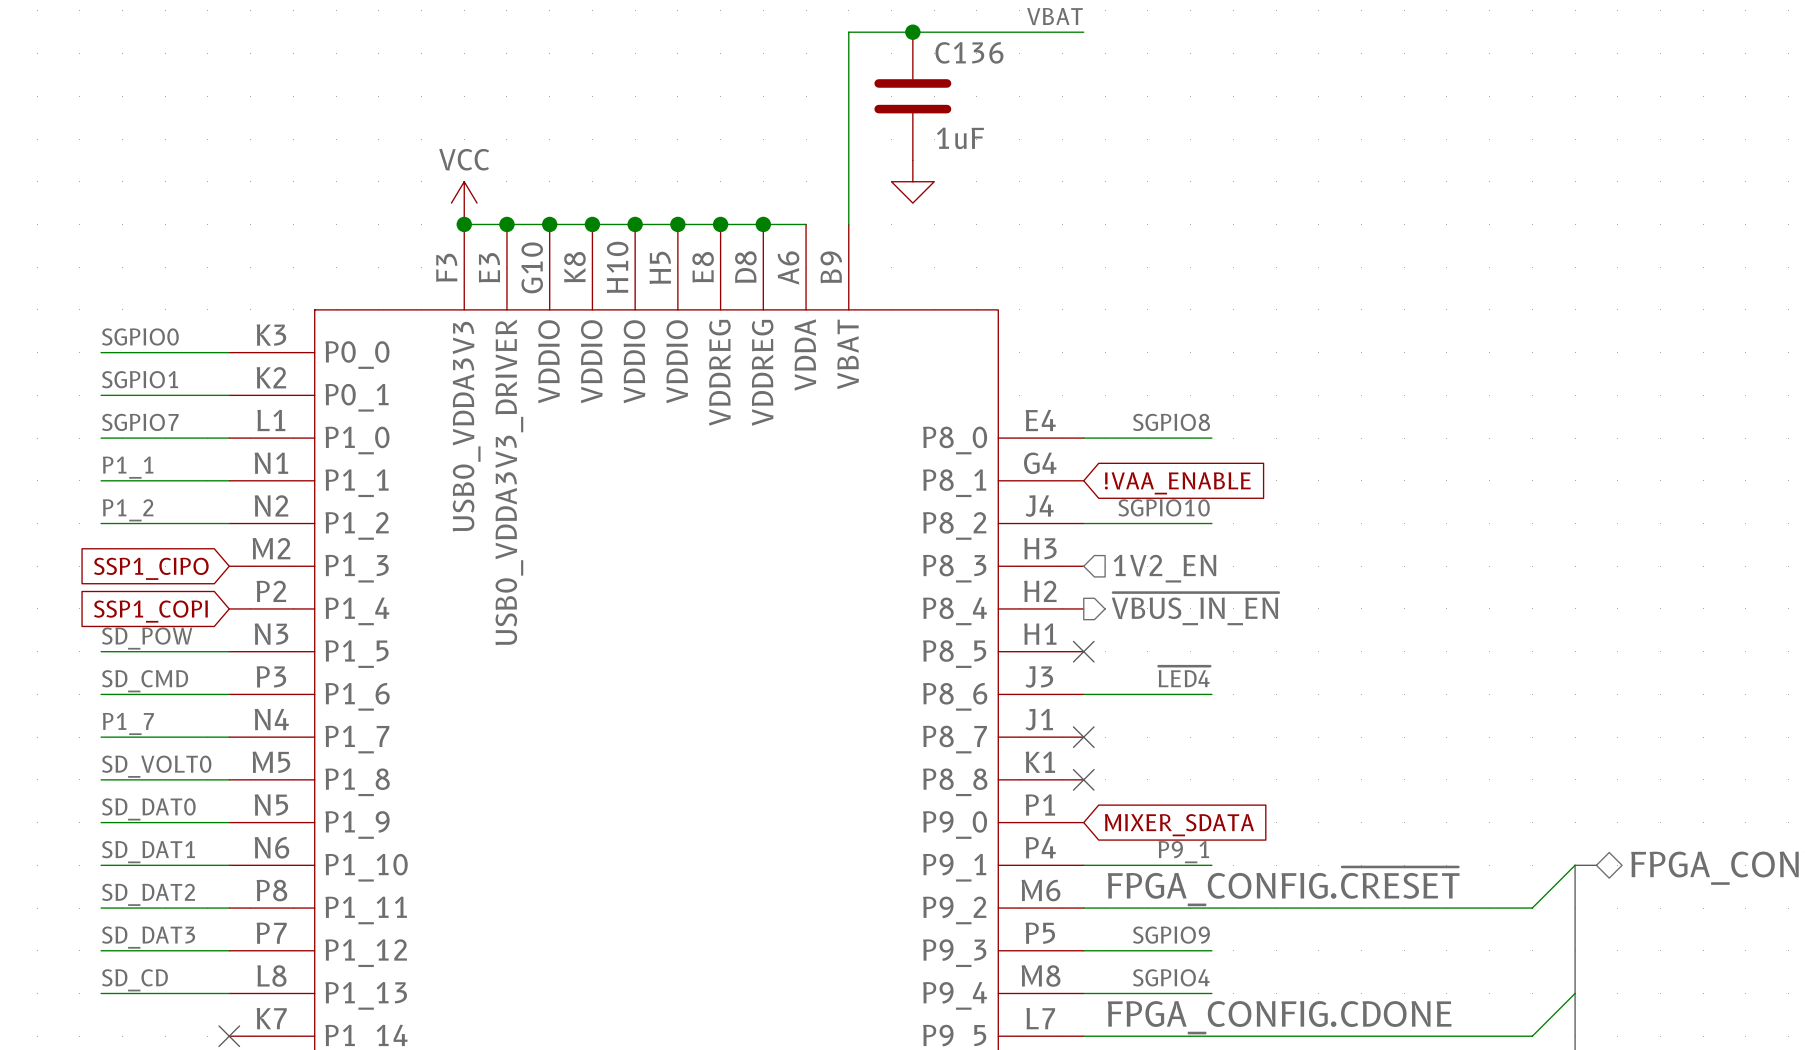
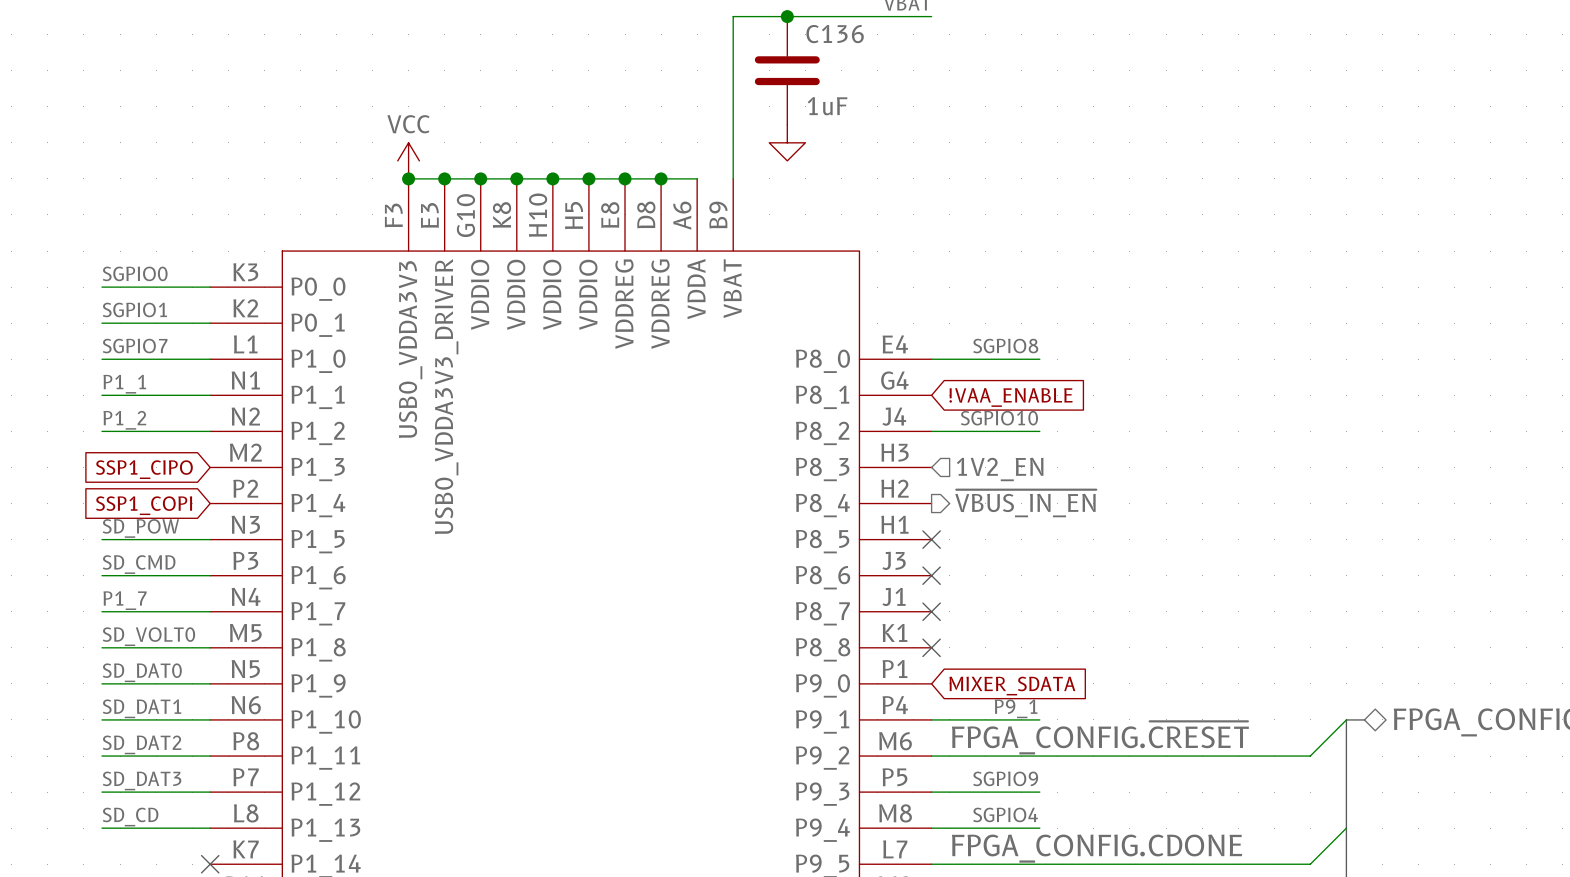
label: ~{LED4} (1184, 676) -> none
wire: (1083, 694) (1211, 694) -> none
no-connect mark: none -> (931, 575)

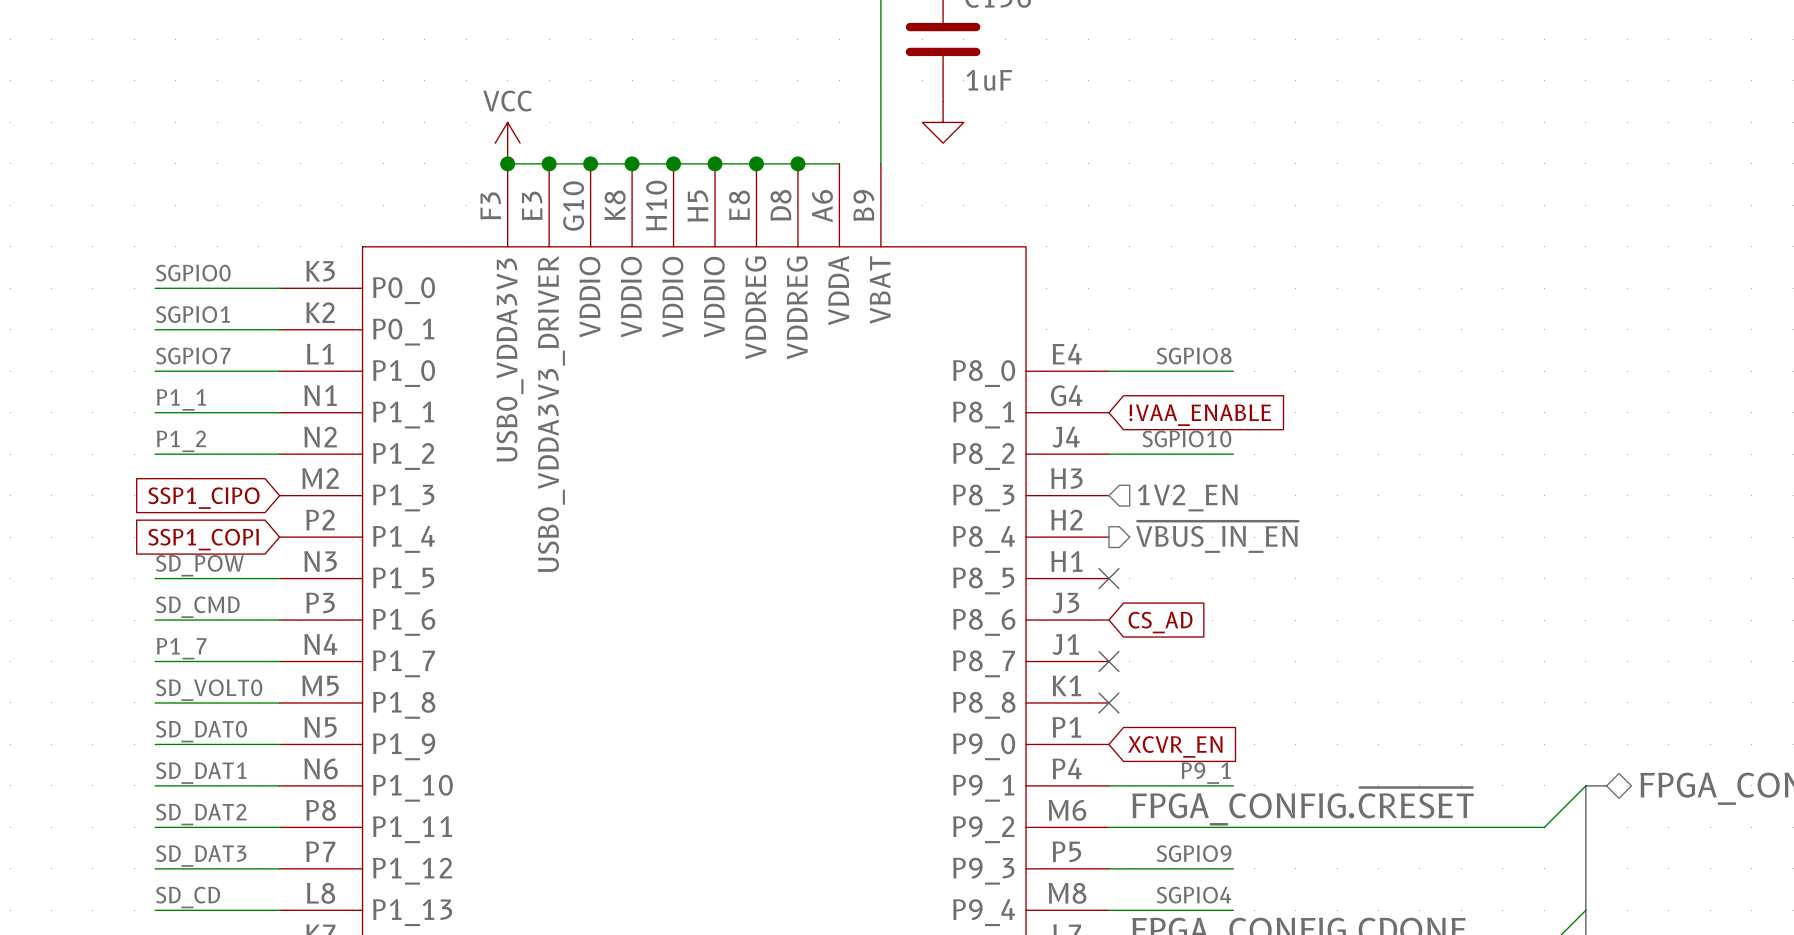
no-connect mark: (931, 575) -> none
global label: none -> CS_AD (1160, 622)
global label: MIXER_SDATA (1012, 686) -> XCVR_EN (1175, 746)

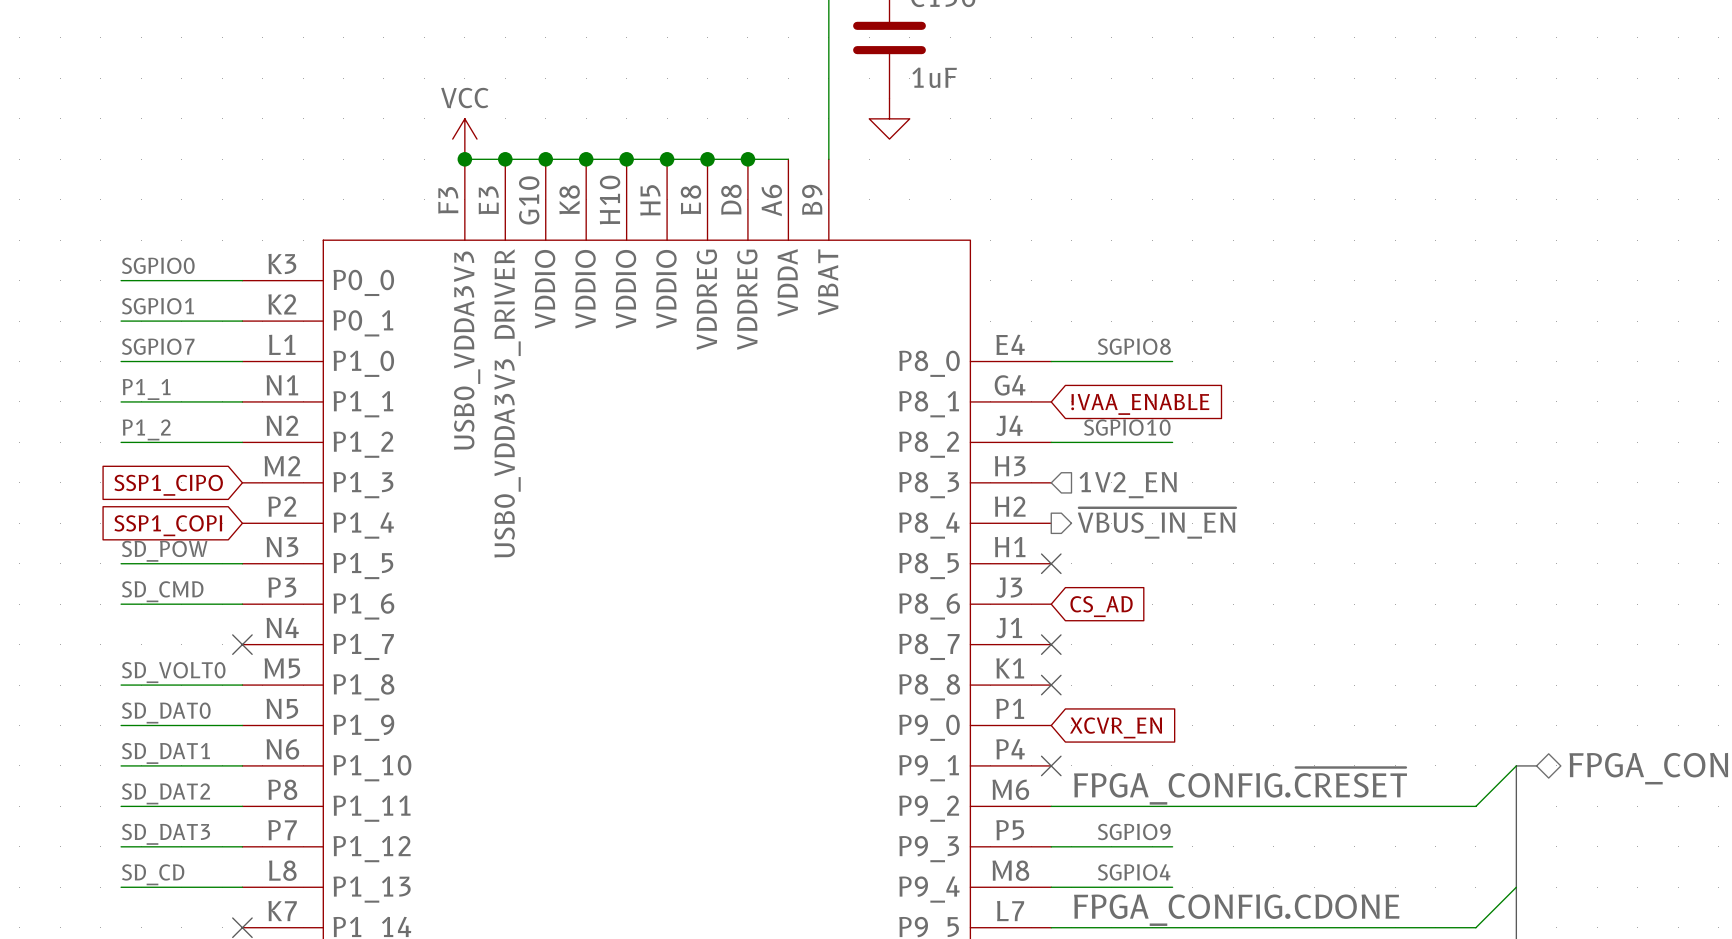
label: P1_7 (181, 648) -> none
wire: (155, 661) (279, 661) -> none
no-connect mark: none -> (242, 644)
label: P9_1 (1206, 773) -> none
wire: (1108, 785) (1233, 785) -> none
no-connect mark: none -> (1051, 765)

